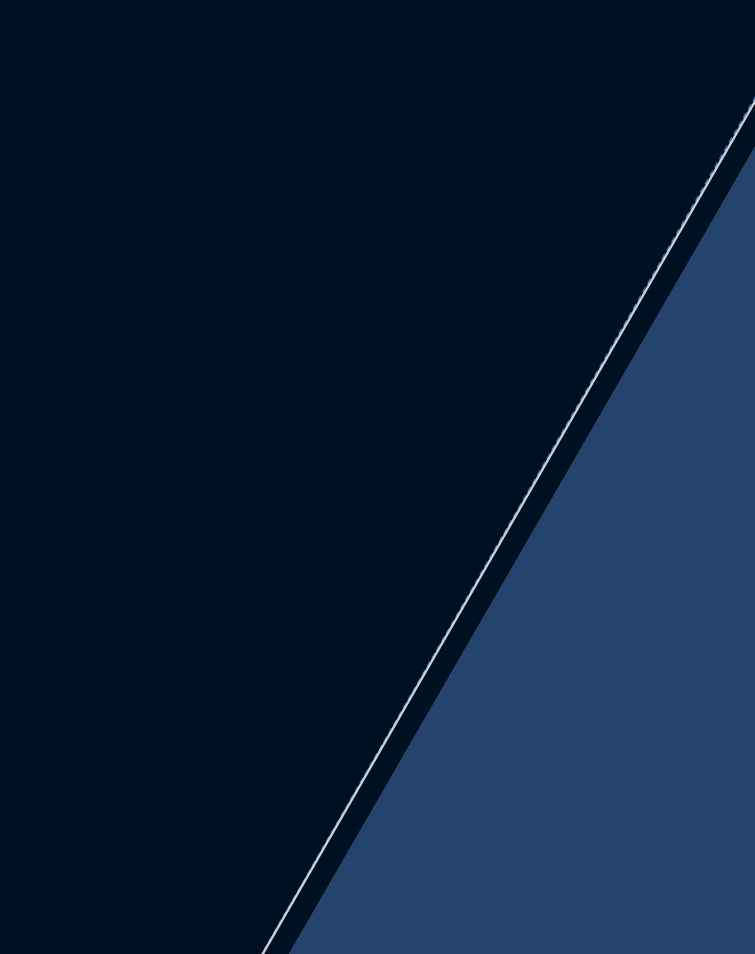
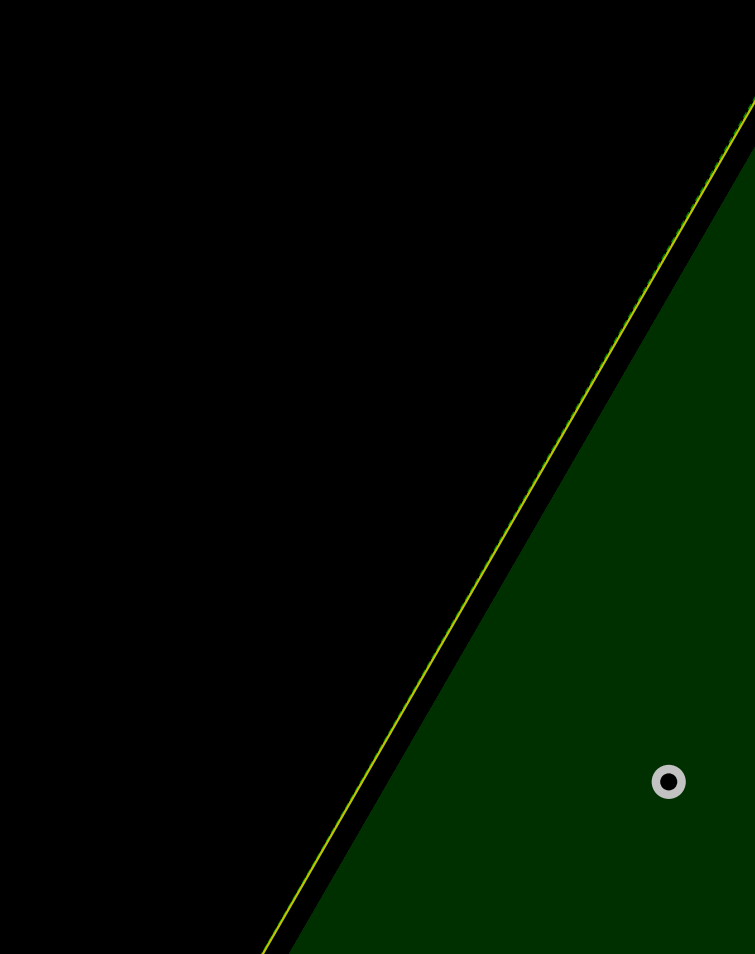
via: none -> (668, 781)

